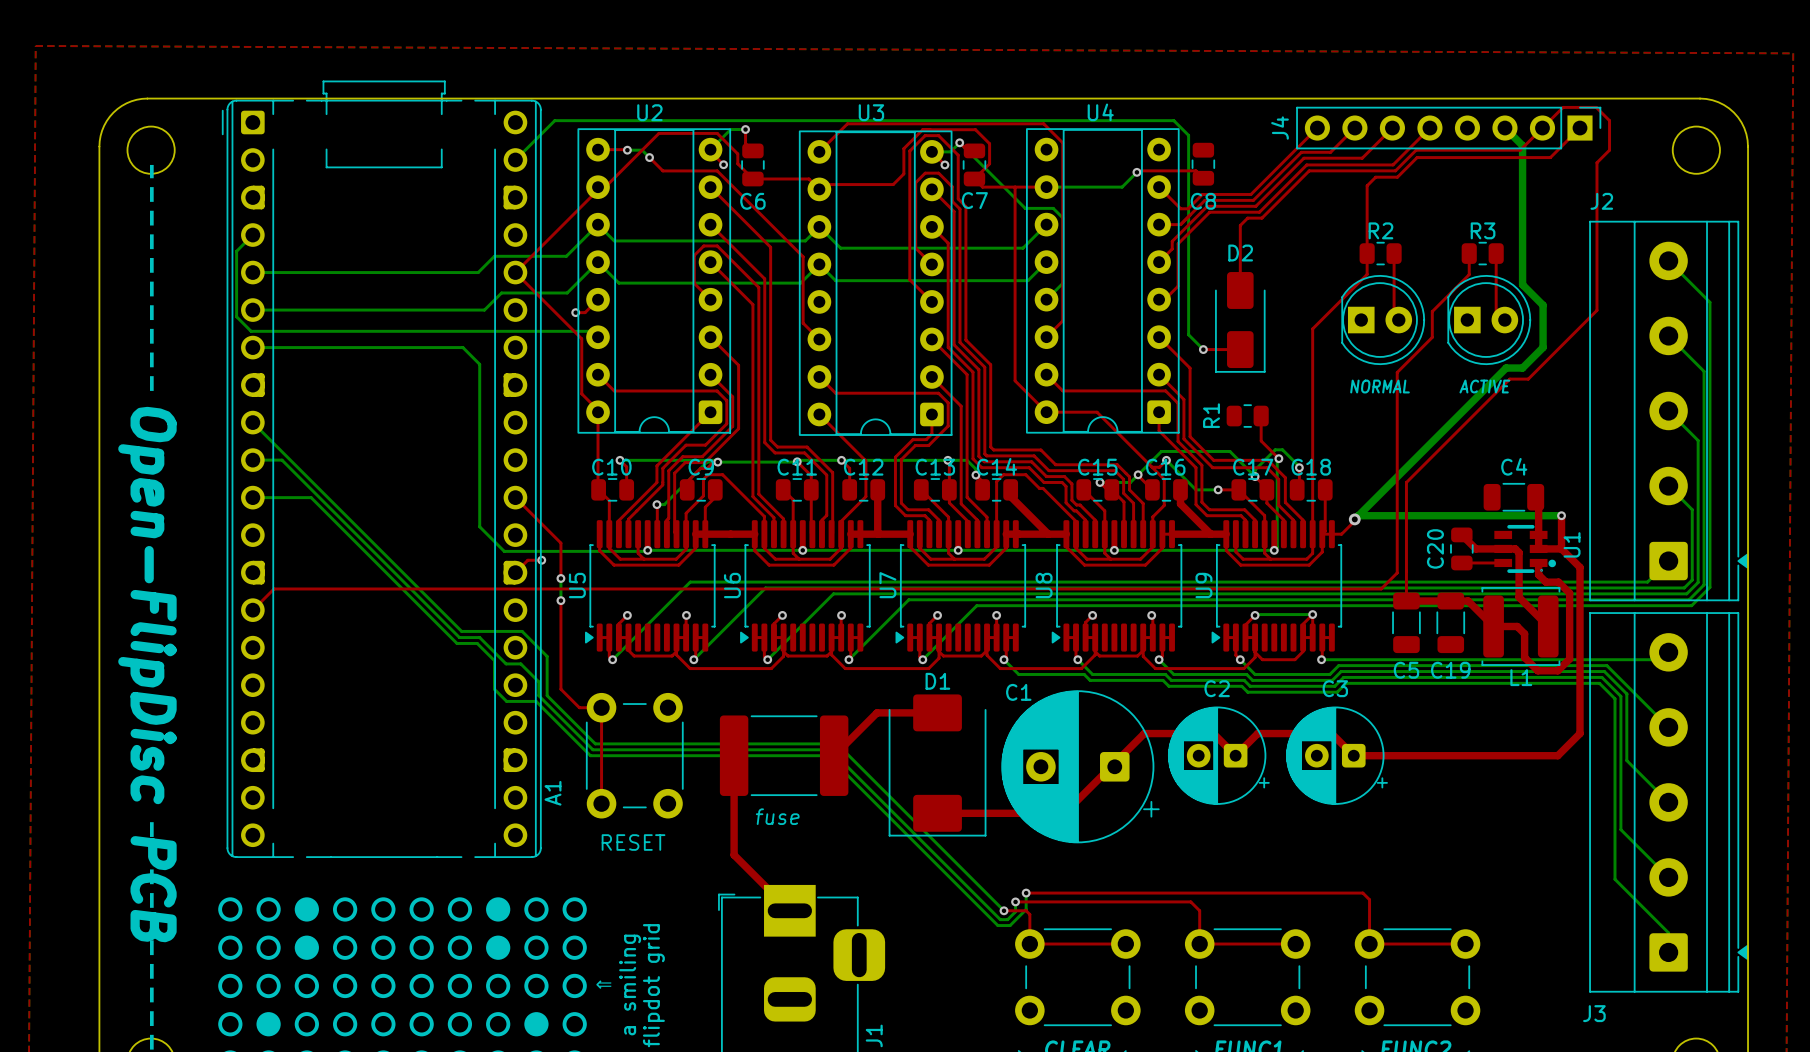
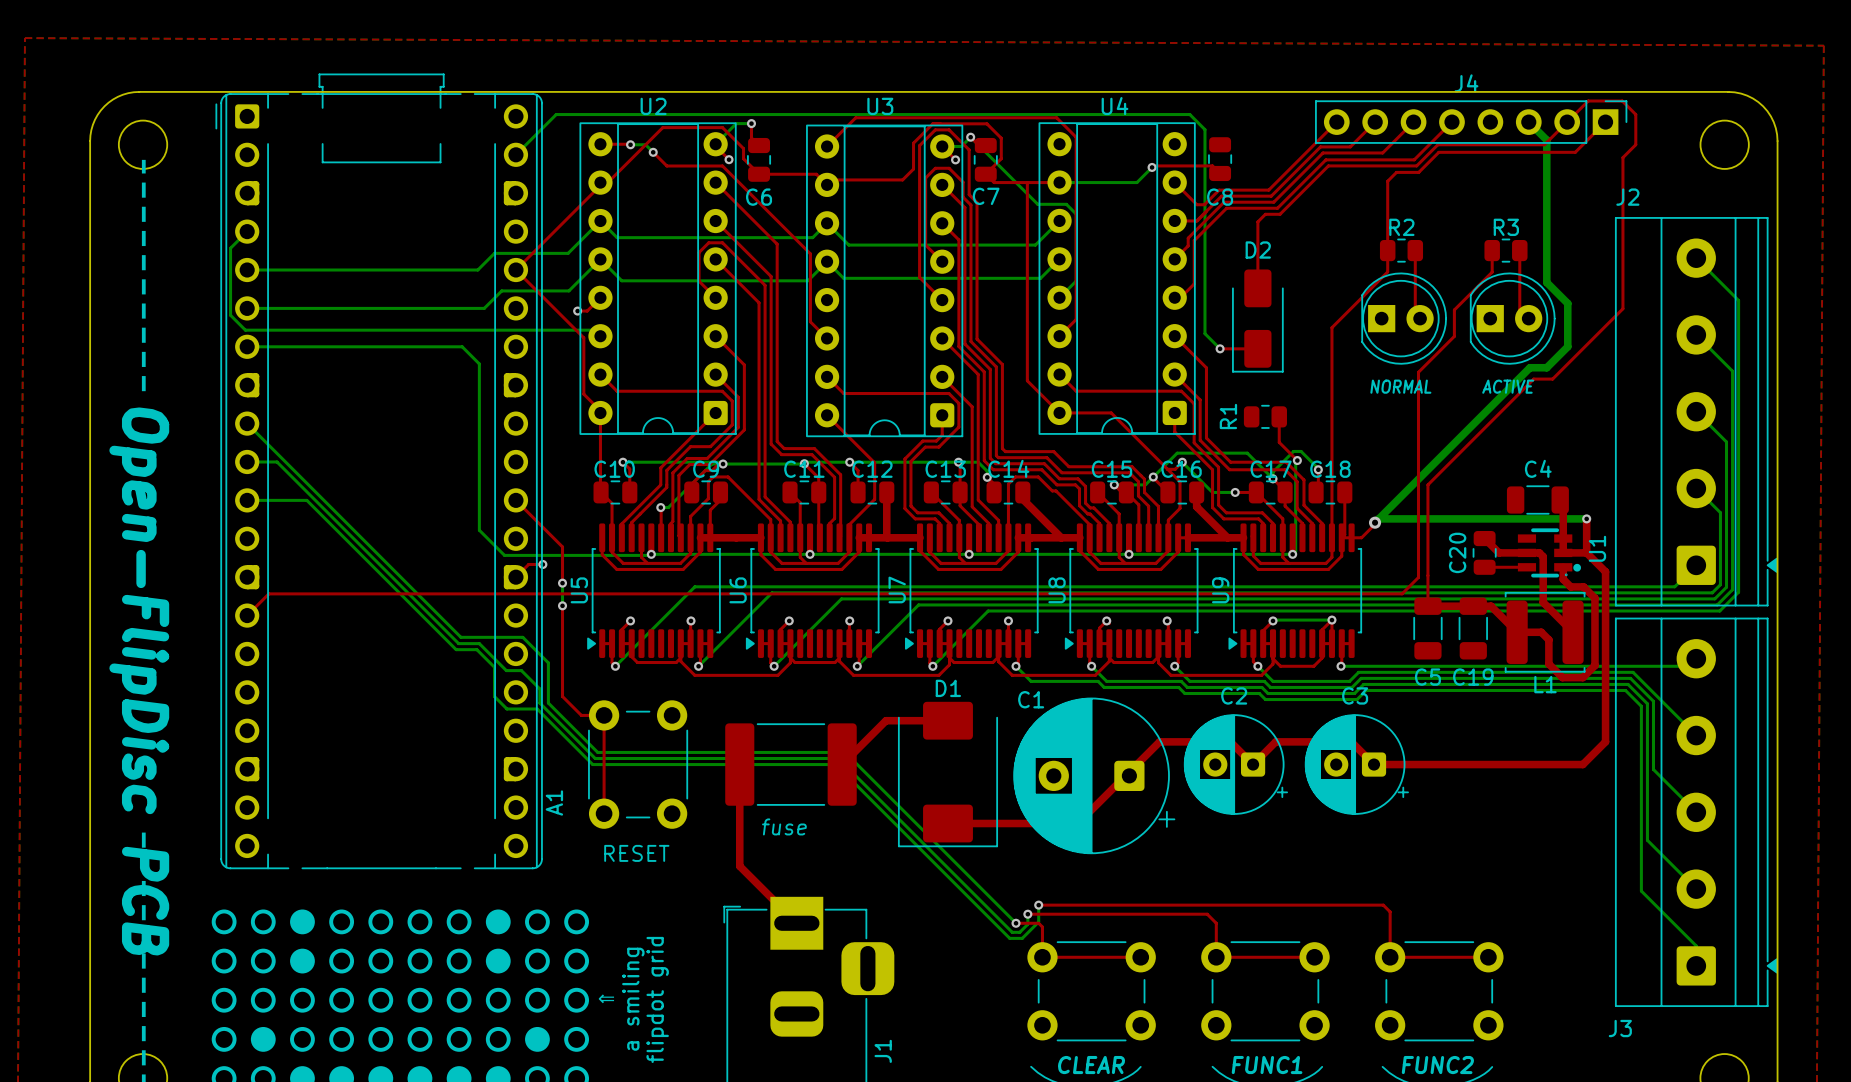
J4 name rotation: 0° (1280, 128) -> 90° clockwise (1466, 83)
J4 name position: J4 (1280, 128) -> J4 (1466, 83)

